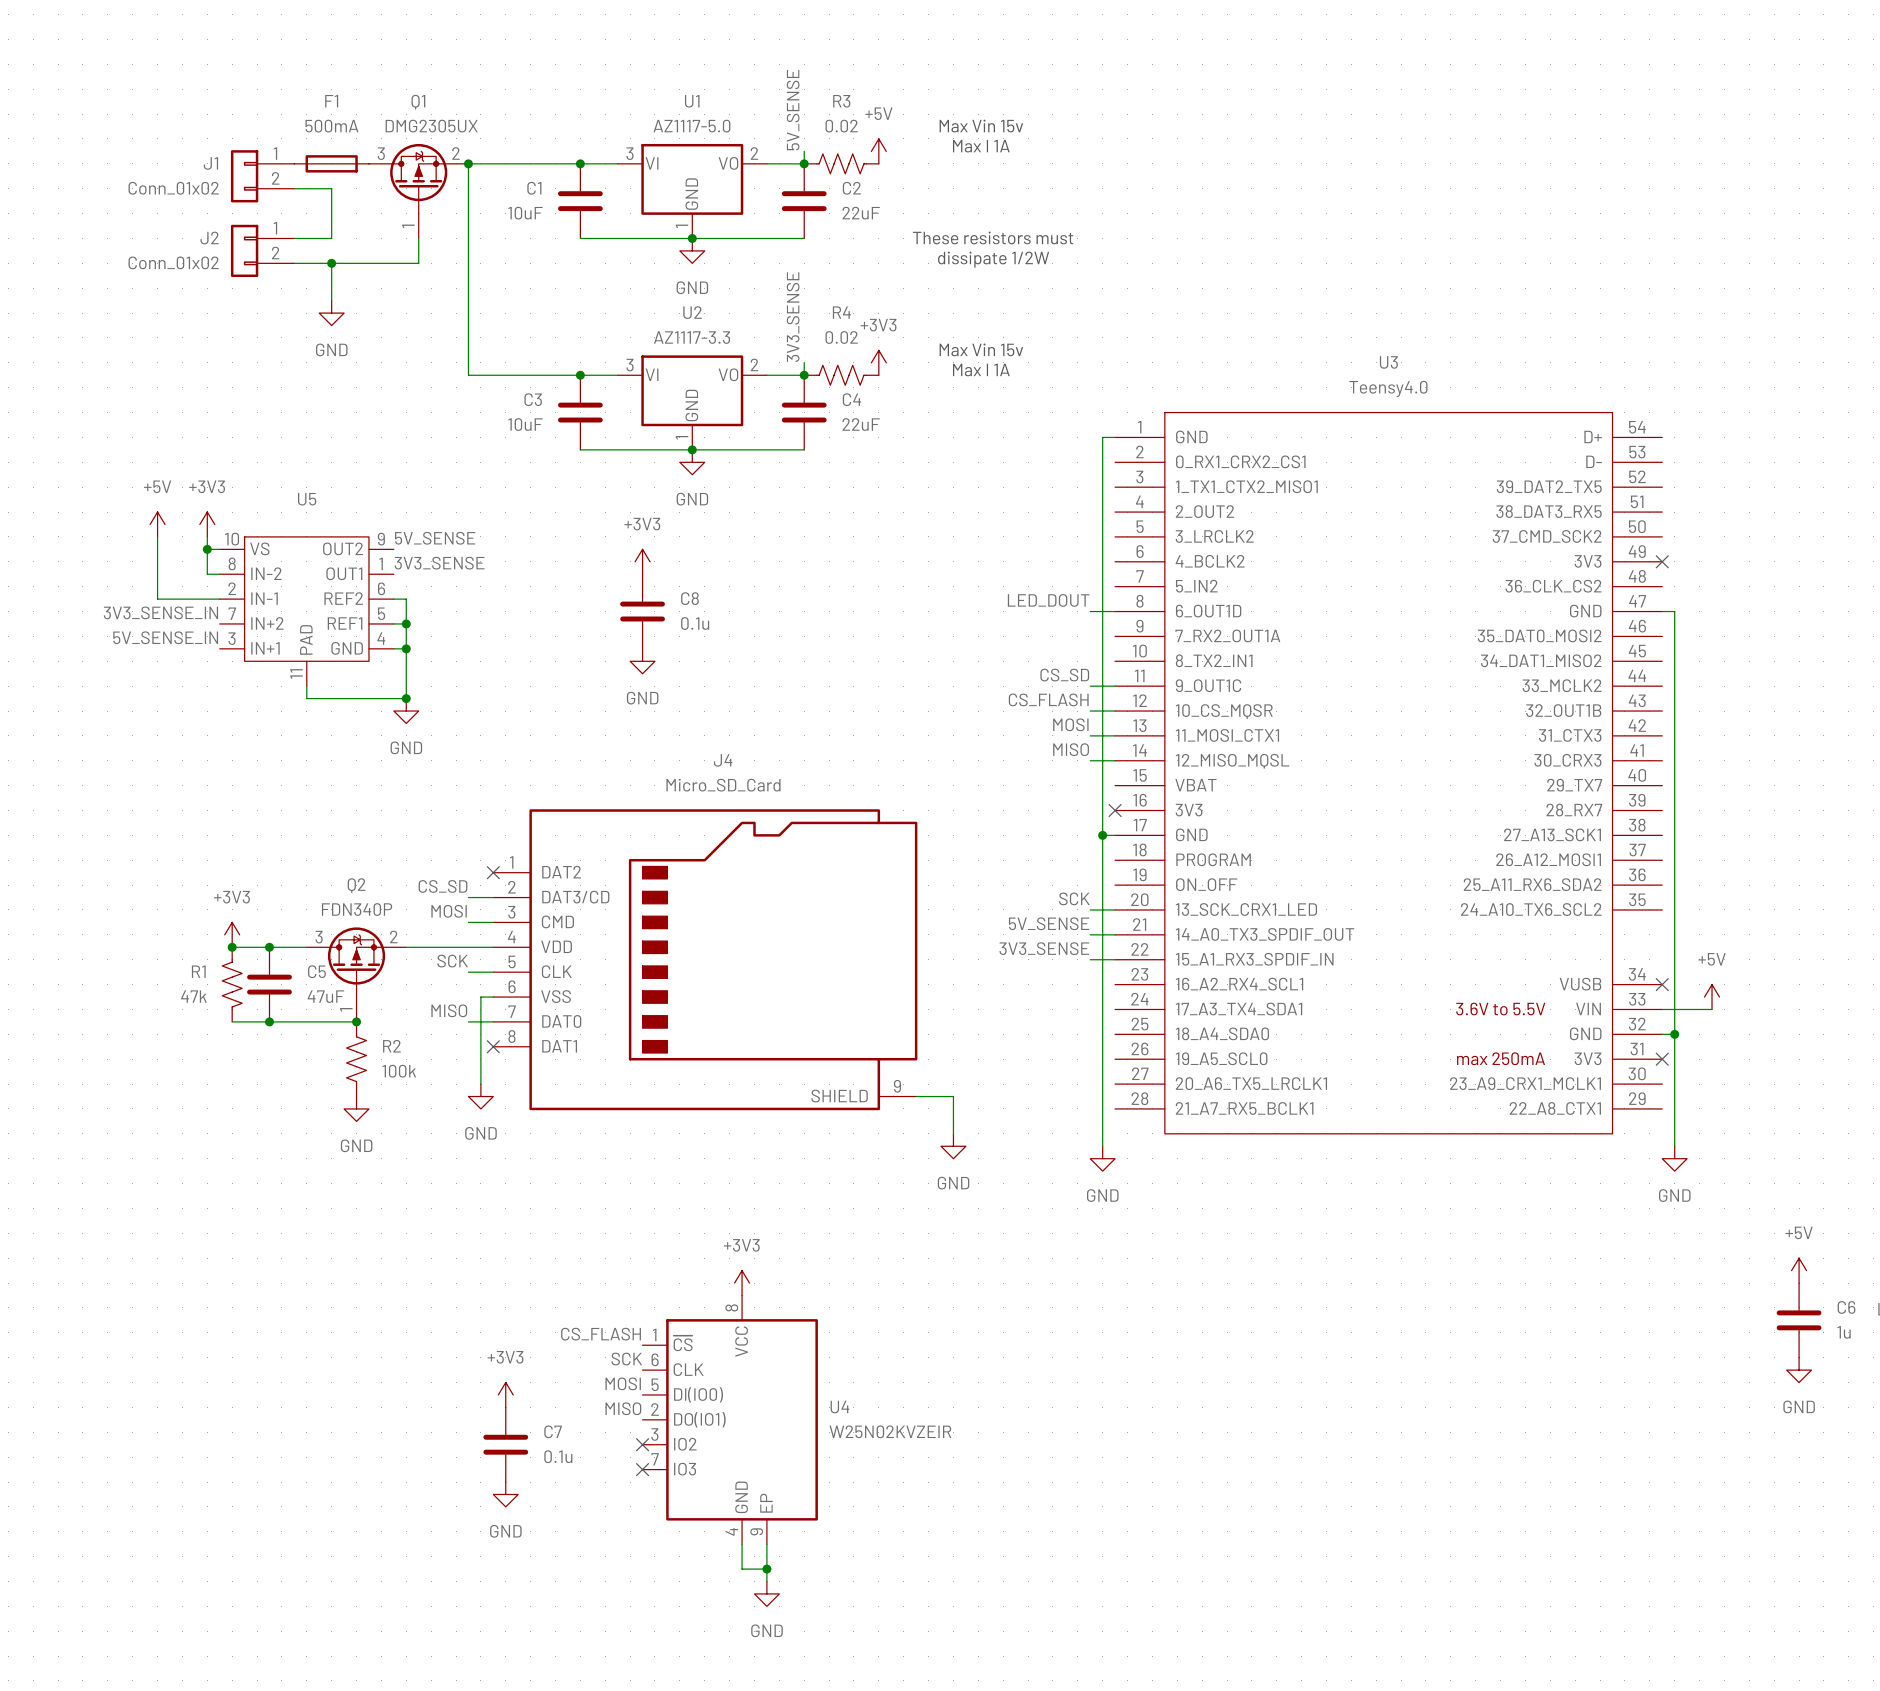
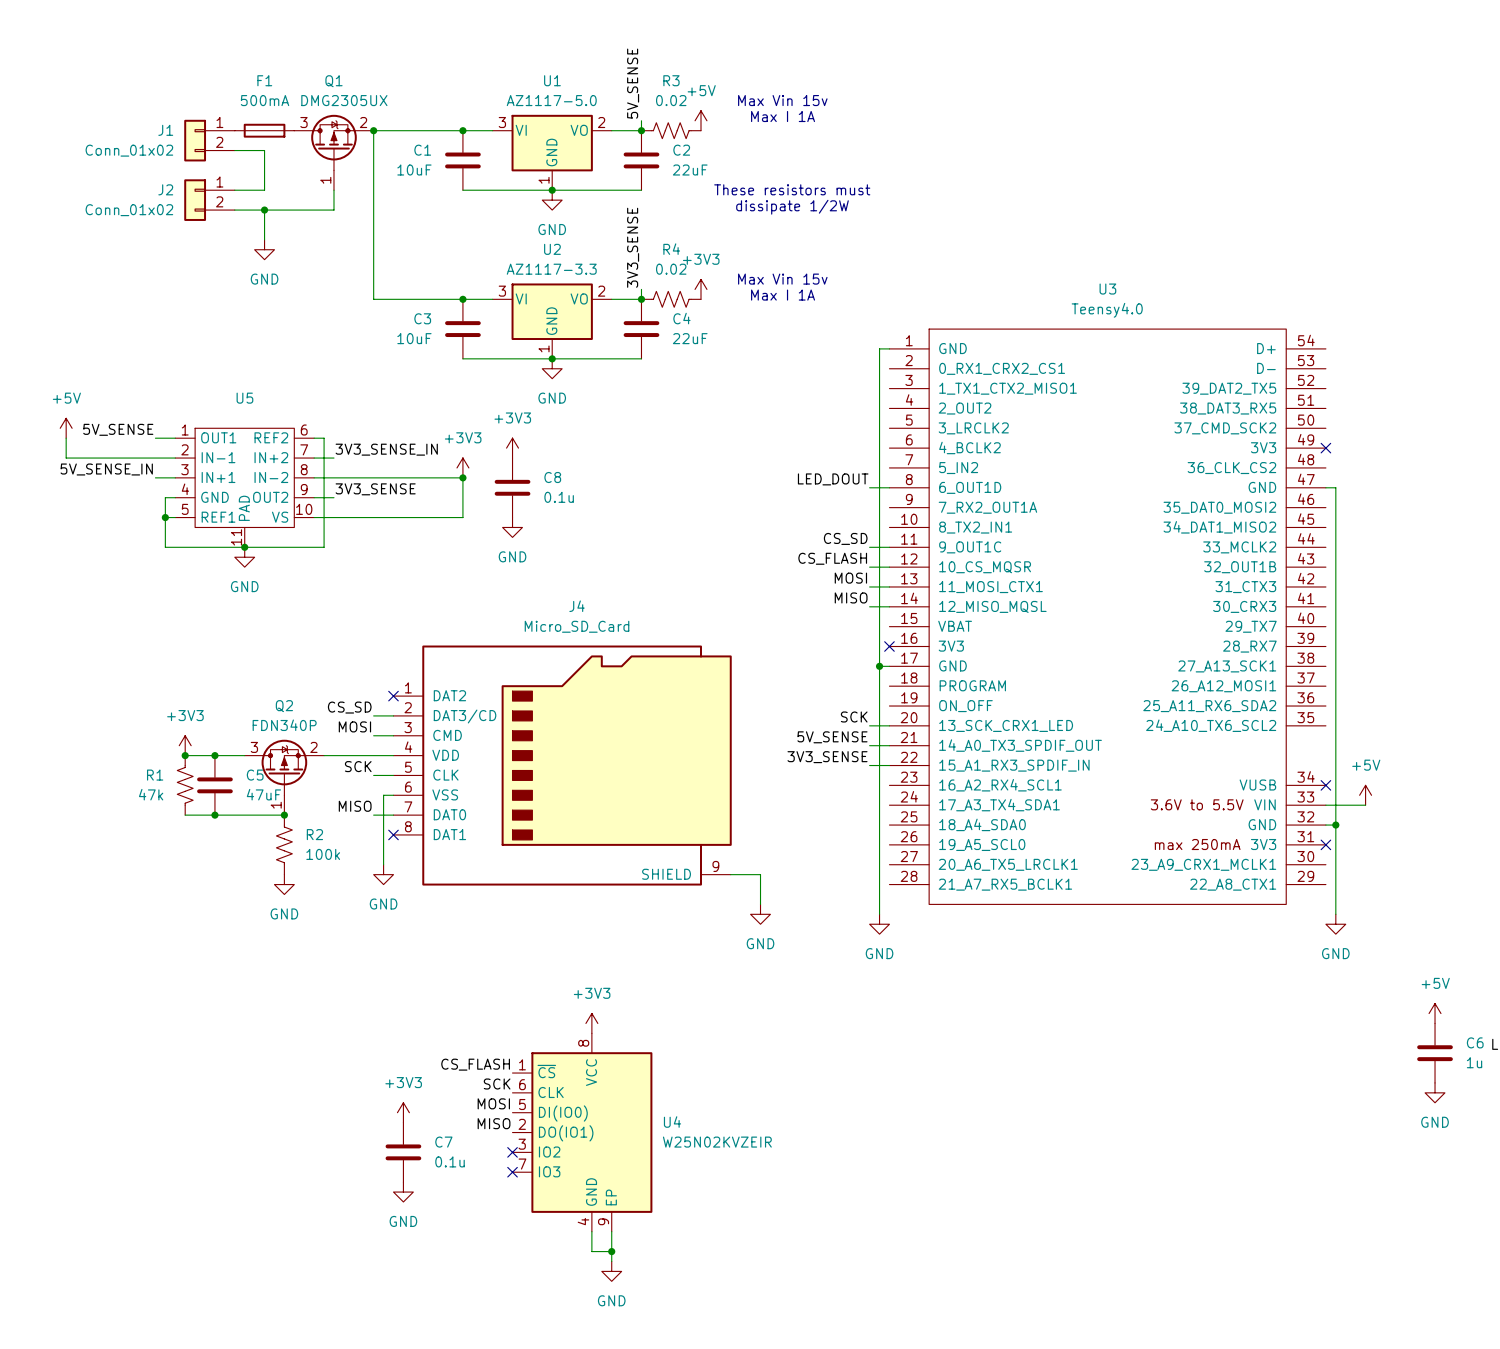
power symbol position: +5V (157, 524) -> +5V (66, 428)
power symbol: +3V3 (207, 524) -> none
wire: (157, 536) (157, 599) (194, 599) -> none
wire: (207, 536) (207, 574) -> (66, 438) (66, 458) (165, 458)
U5 symbol: [219, 536, 394, 687] -> [175, 428, 315, 548]
label position: 5V_SENSE (435, 538) -> 5V_SENSE (118, 429)
wire: none -> (155, 438) (165, 438)
junction: (207, 549) -> none
wire: none -> (314, 438) (324, 438) (324, 477) (462, 477) (462, 517) (324, 517)
label position: 3V3_SENSE (439, 563) -> 3V3_SENSE (375, 489)
wire: none -> (314, 458) (333, 458)
power symbol: none -> +3V3 (462, 467)
junction: none -> (462, 477)
label position: 3V3_SENSE_IN (160, 612) -> 3V3_SENSE_IN (386, 449)
wire: none -> (324, 497) (333, 497)
junction: (406, 623) -> none
label position: 5V_SENSE_IN (165, 637) -> 5V_SENSE_IN (106, 469)
wire: none -> (165, 517) (175, 517)
junction: none -> (165, 517)
junction: (406, 648) -> none
wire: (306, 686) (306, 698) (406, 698) (406, 686) -> (175, 497) (165, 497) (165, 547) (324, 547)
junction: none -> (244, 547)
junction: (406, 698) -> none
power symbol position: GND (406, 711) -> GND (244, 557)

